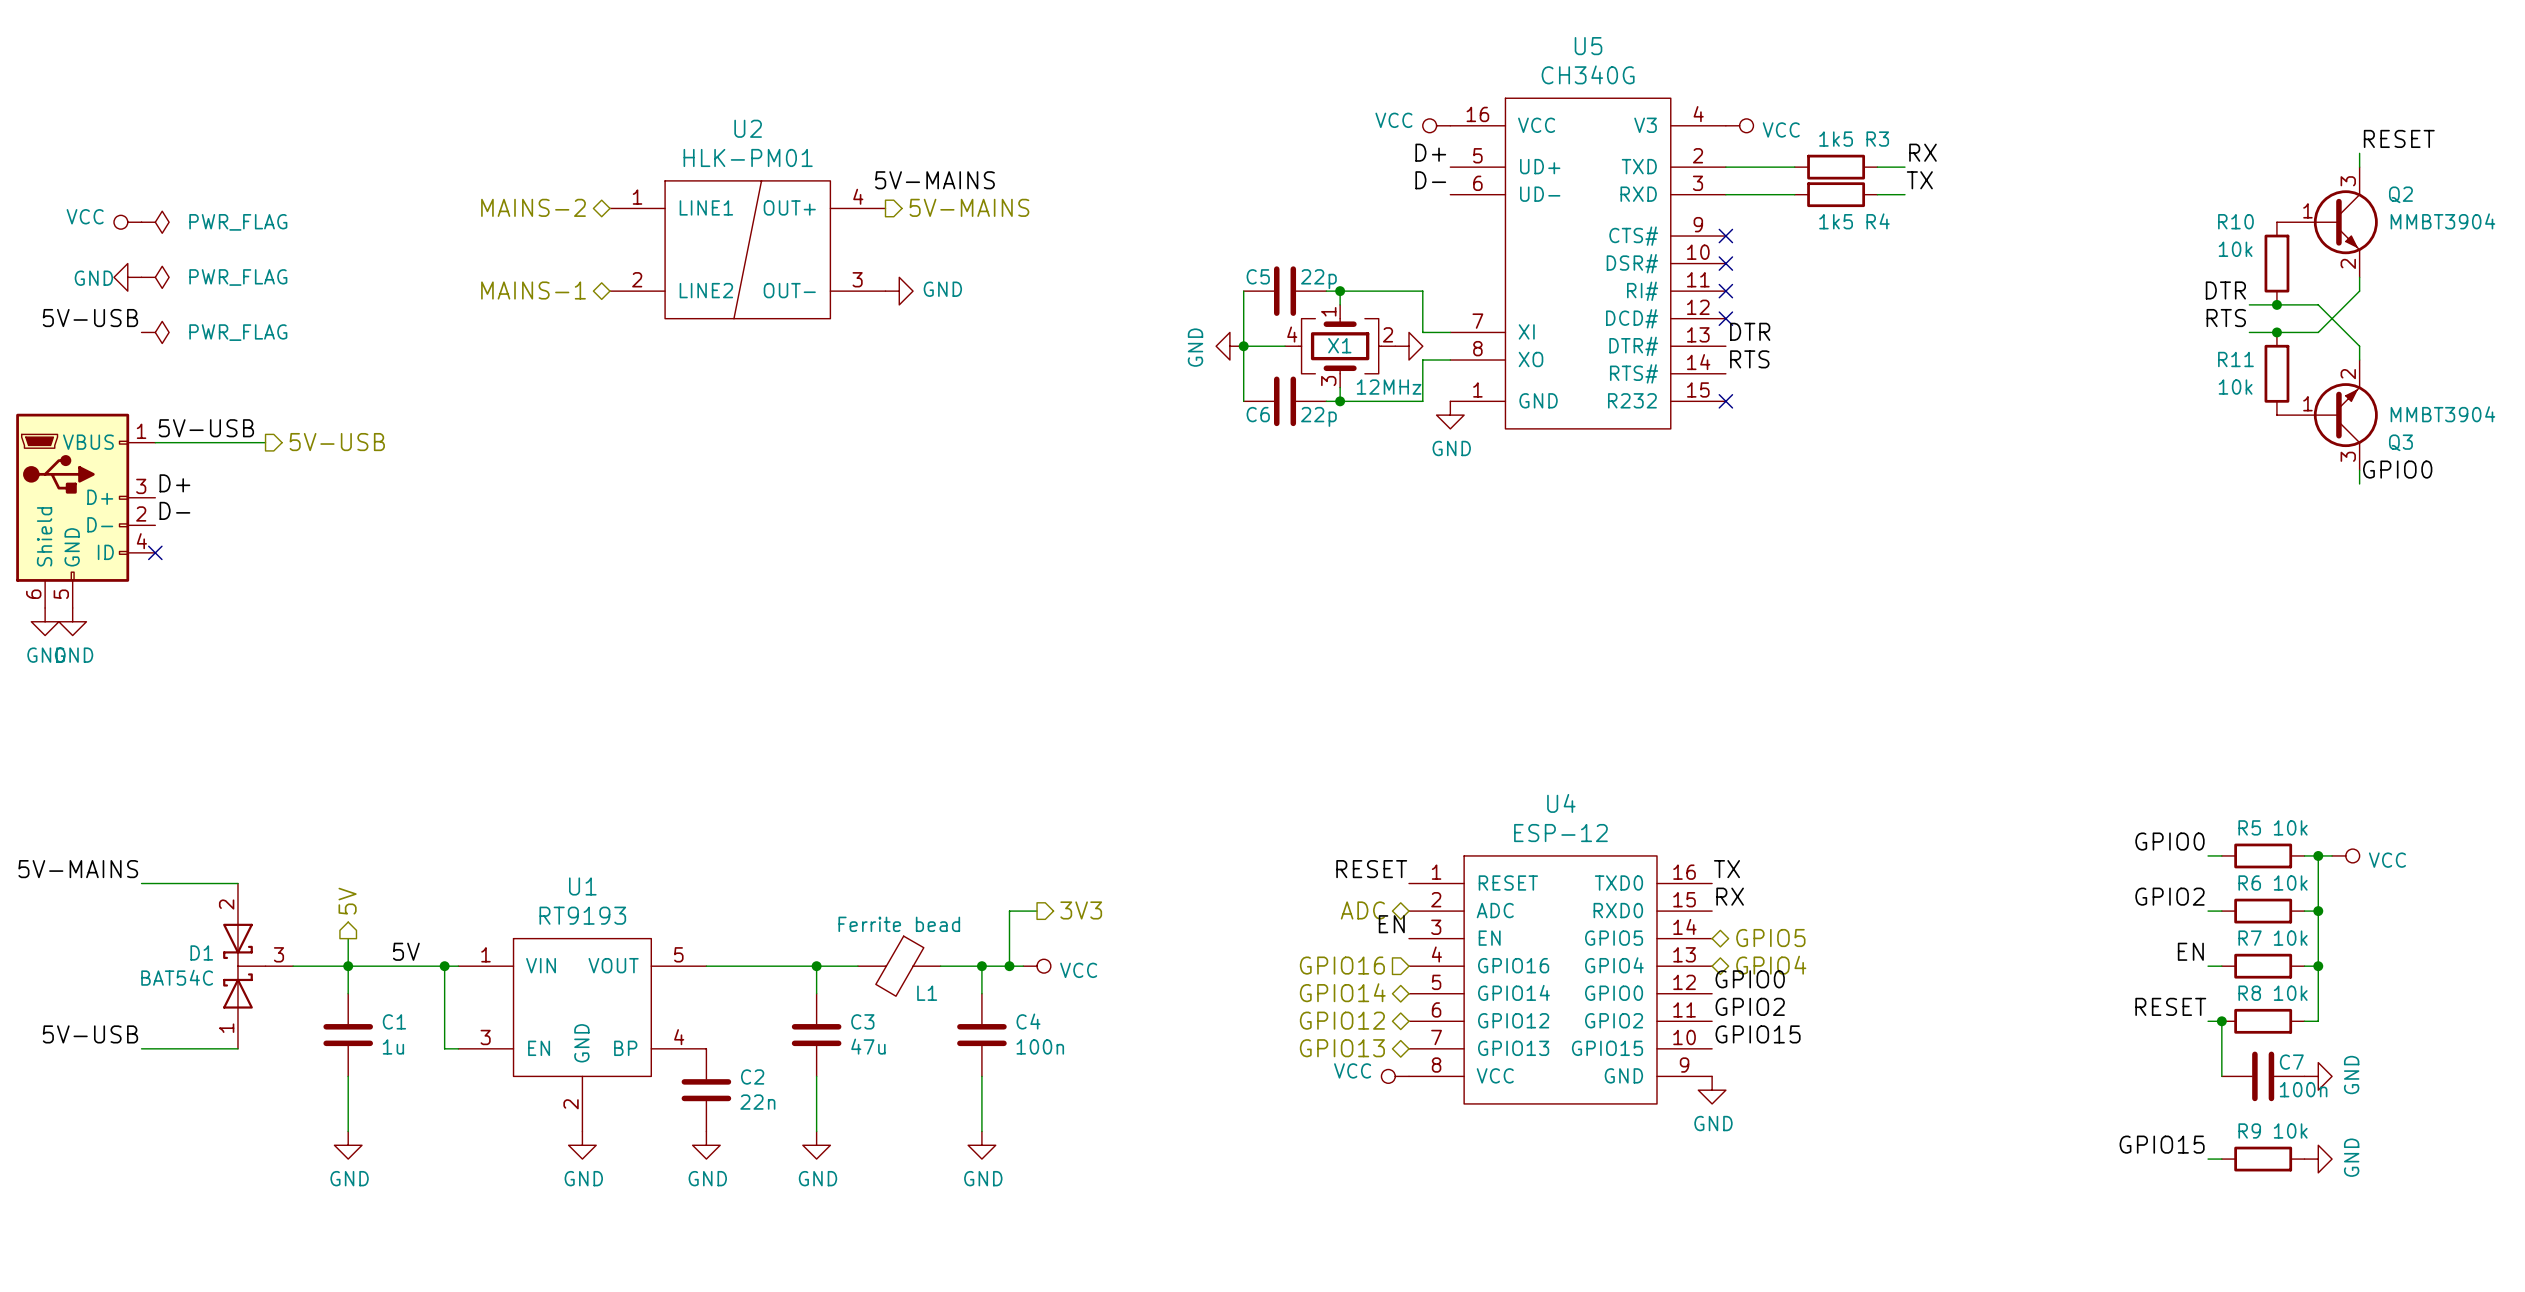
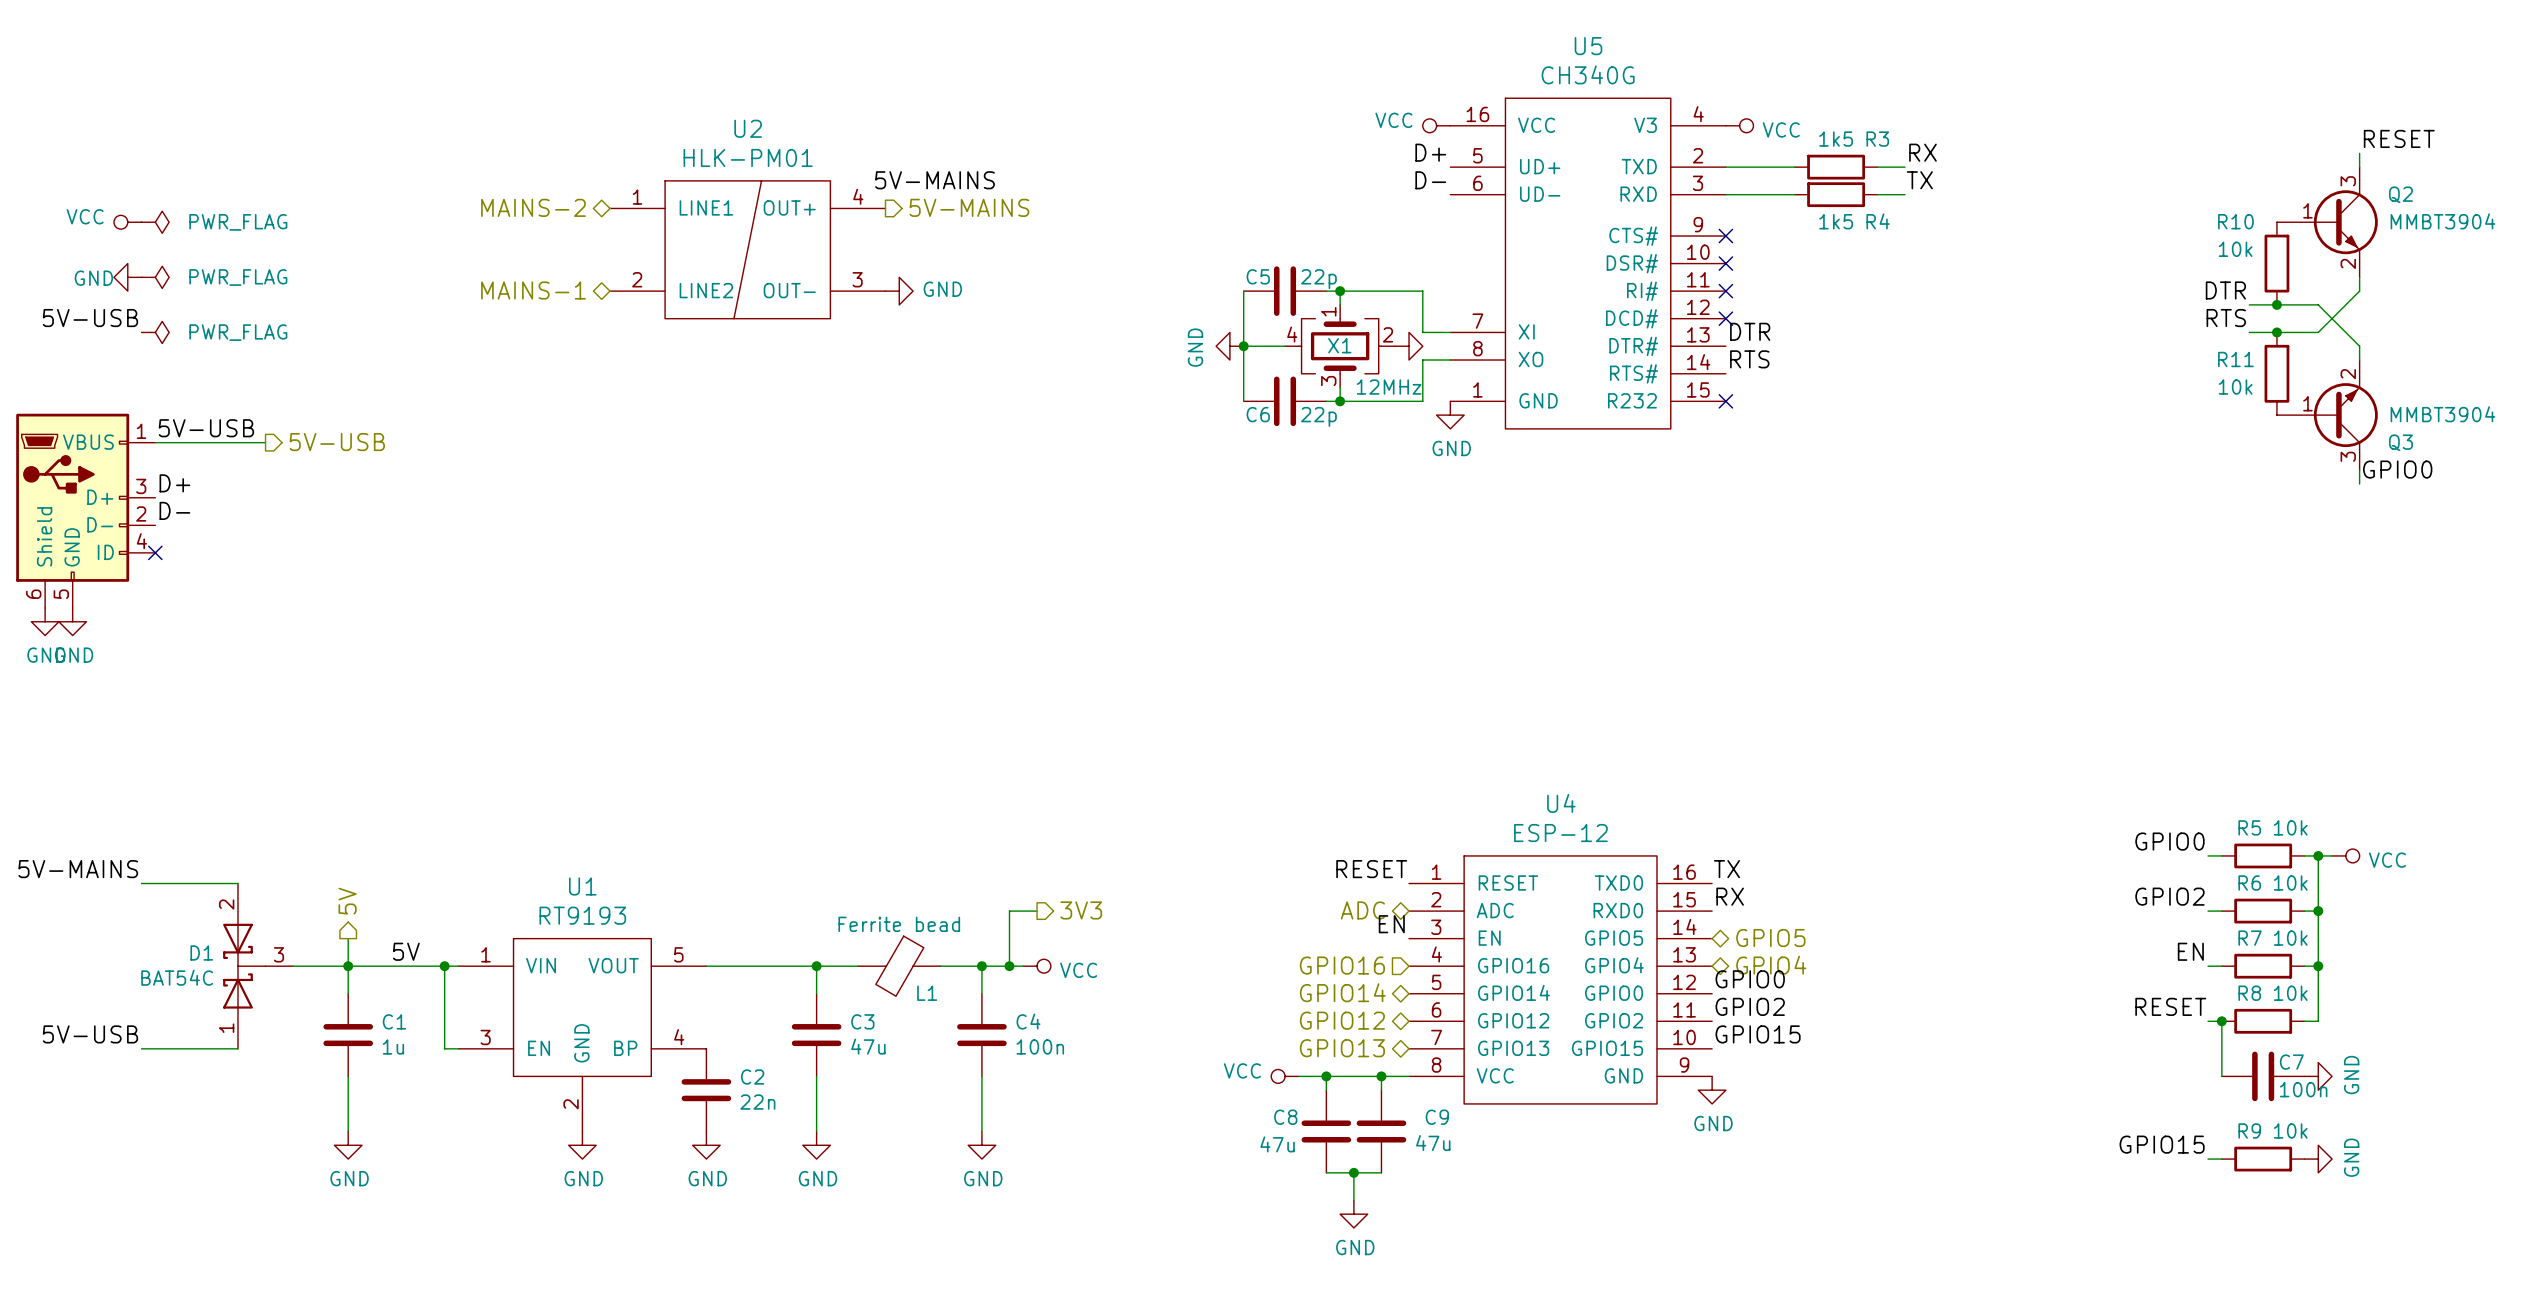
wire: none -> (1298, 1076) (1409, 1076)
wire: none -> (1326, 1076) (1326, 1090)
junction: none -> (1326, 1076)
wire: none -> (1381, 1076) (1381, 1090)
junction: none -> (1381, 1076)
power symbol position: VCC (1395, 1076) -> VCC (1285, 1076)
C8: none -> 47u (1326, 1131)
C9: none -> 47u (1381, 1131)
wire: none -> (1326, 1172) (1381, 1172)
wire: none -> (1353, 1172) (1353, 1200)
junction: none -> (1353, 1172)
power symbol: none -> GND (1353, 1214)

